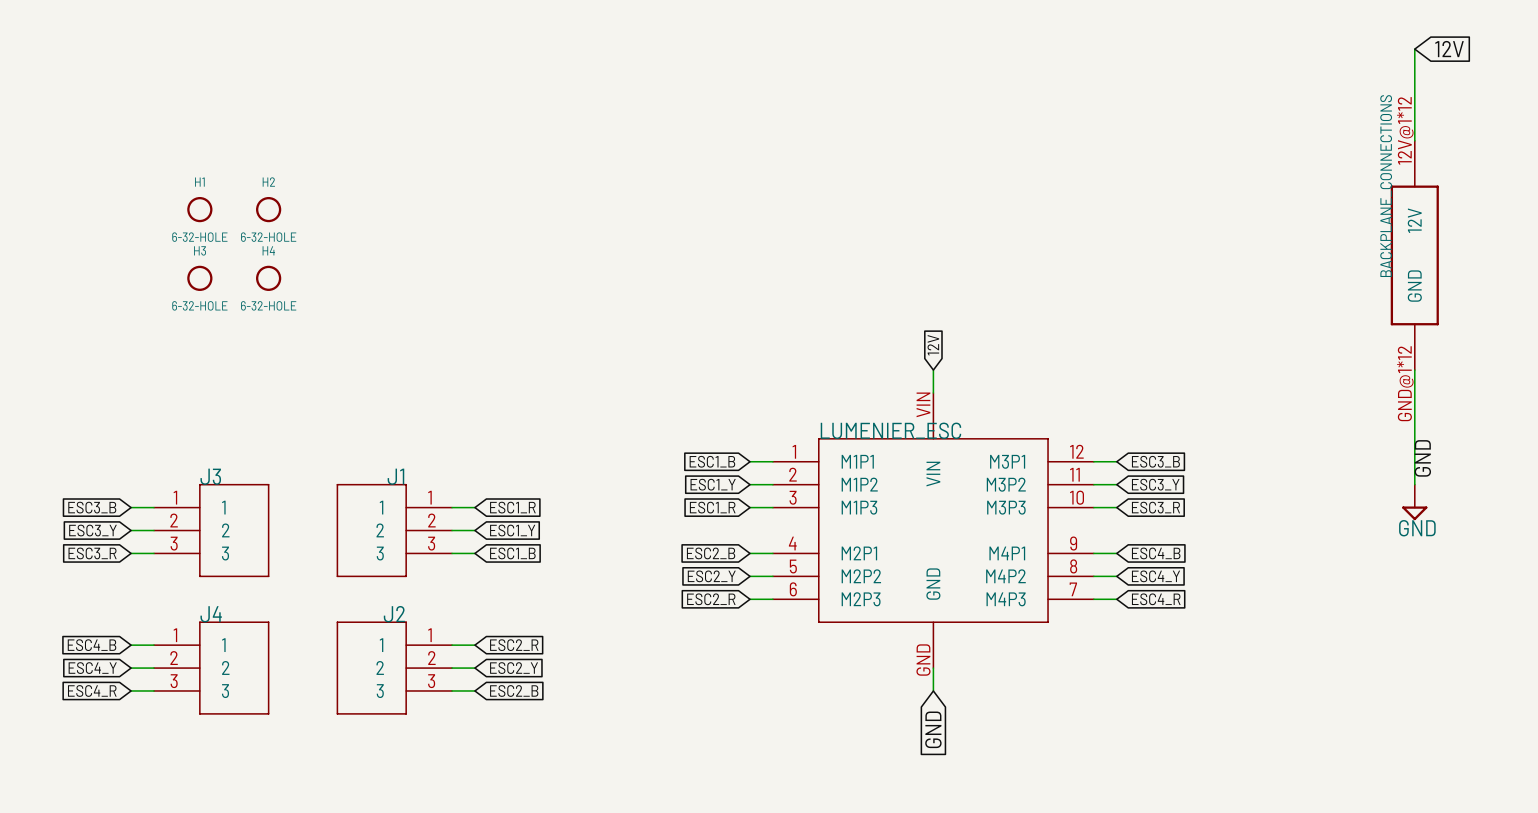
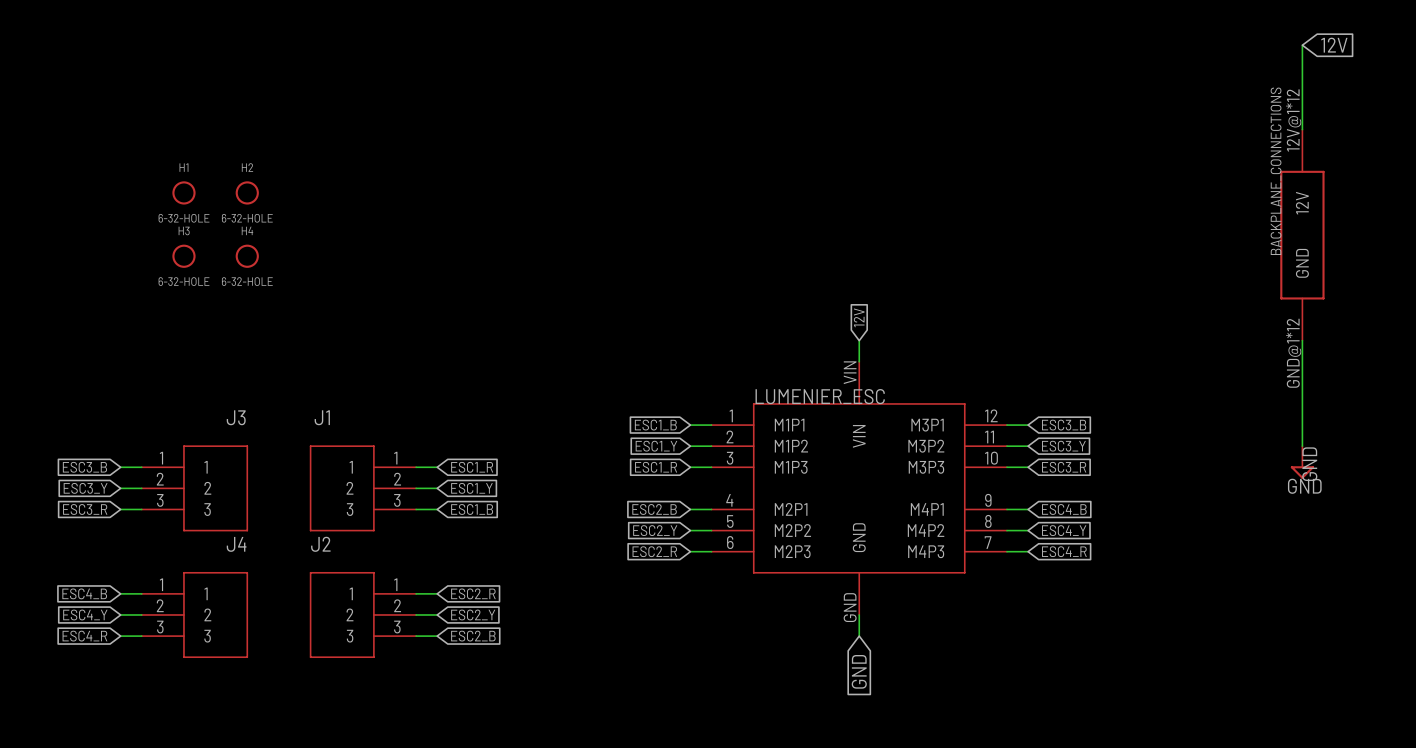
label position: GND (1422, 458) -> GND (1309, 464)
J3 name position: J3 (210, 476) -> J3 (236, 417)
J1 name position: J1 (395, 476) -> J1 (322, 417)
J4 name position: J4 (211, 614) -> J4 (236, 544)
J2 name position: J2 (394, 614) -> J2 (320, 544)

